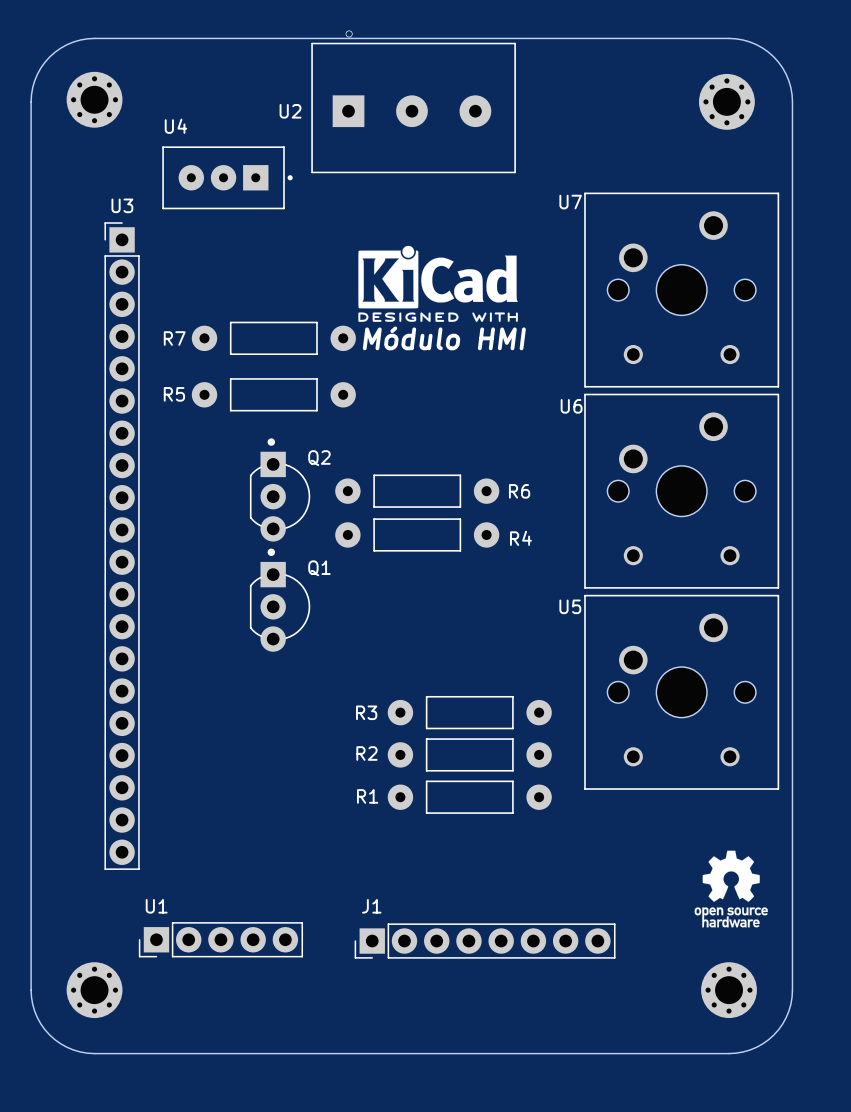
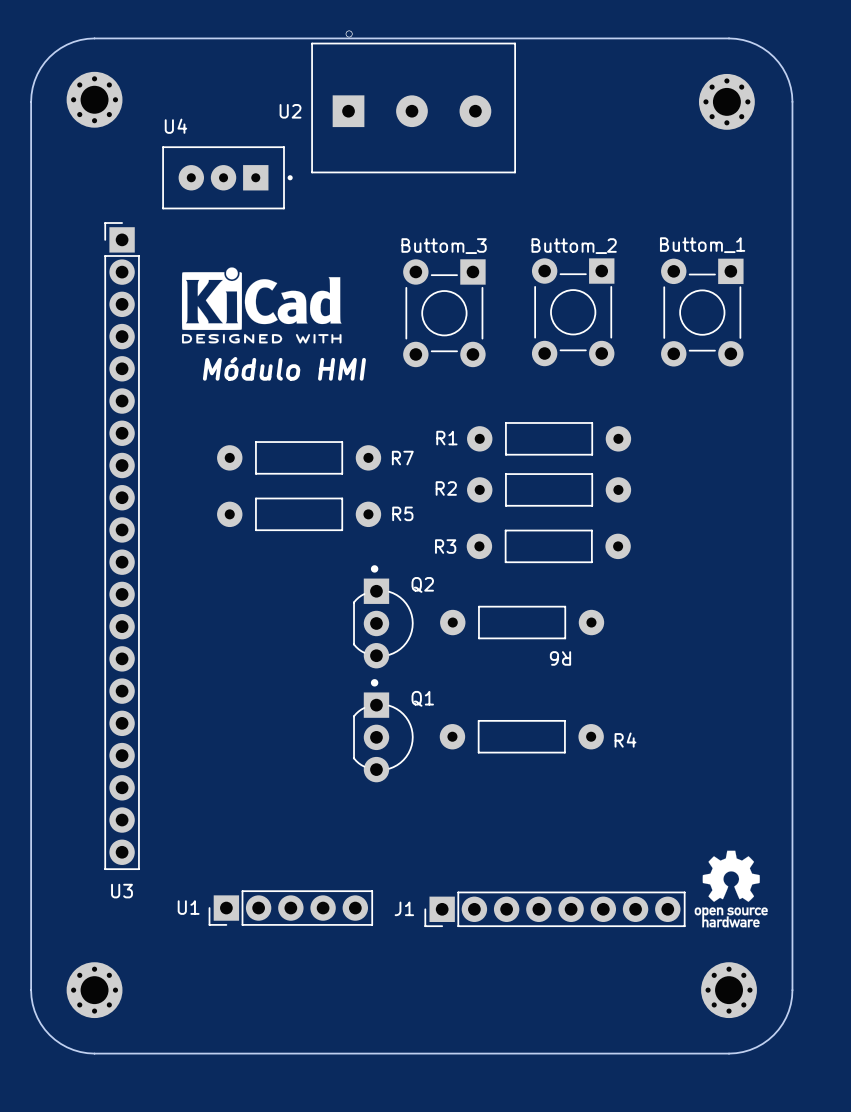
U3 name position: U3 (122, 205) -> U3 (122, 891)
drawing position: (438, 283) -> (261, 305)
U7: (681, 290) -> none
Buttom_2: none -> (573, 312)
Buttom_1: none -> (702, 312)
Buttom_3: none -> (444, 313)
R7 name position: R7 (174, 338) -> R7 (402, 458)
R7 position: (273, 338) -> (299, 457)
text position: Módulo HMI (444, 338) -> Módulo HMI (284, 368)
R5 name position: R5 (174, 394) -> R5 (402, 513)
R5 position: (273, 394) -> (299, 514)
Q2 position: (280, 489) -> (383, 616)
R6 position: (417, 491) -> (522, 622)
R6 name rotation: 0° (519, 491) -> 180° (560, 658)
R6 name position: R6 (519, 491) -> R6 (560, 658)
U6: (681, 491) -> none
R4 position: (417, 534) -> (521, 736)
Q1 position: (280, 600) -> (383, 730)
U5: (681, 692) -> none
R3 position: (469, 712) -> (548, 546)
R2 position: (469, 754) -> (549, 489)
R1 position: (469, 797) -> (549, 438)
U1 name position: U1 (156, 906) -> U1 (188, 907)
J1 name position: J1 (371, 906) -> J1 (404, 908)
U1 position: (220, 939) -> (290, 908)
J1 position: (485, 941) -> (554, 909)

